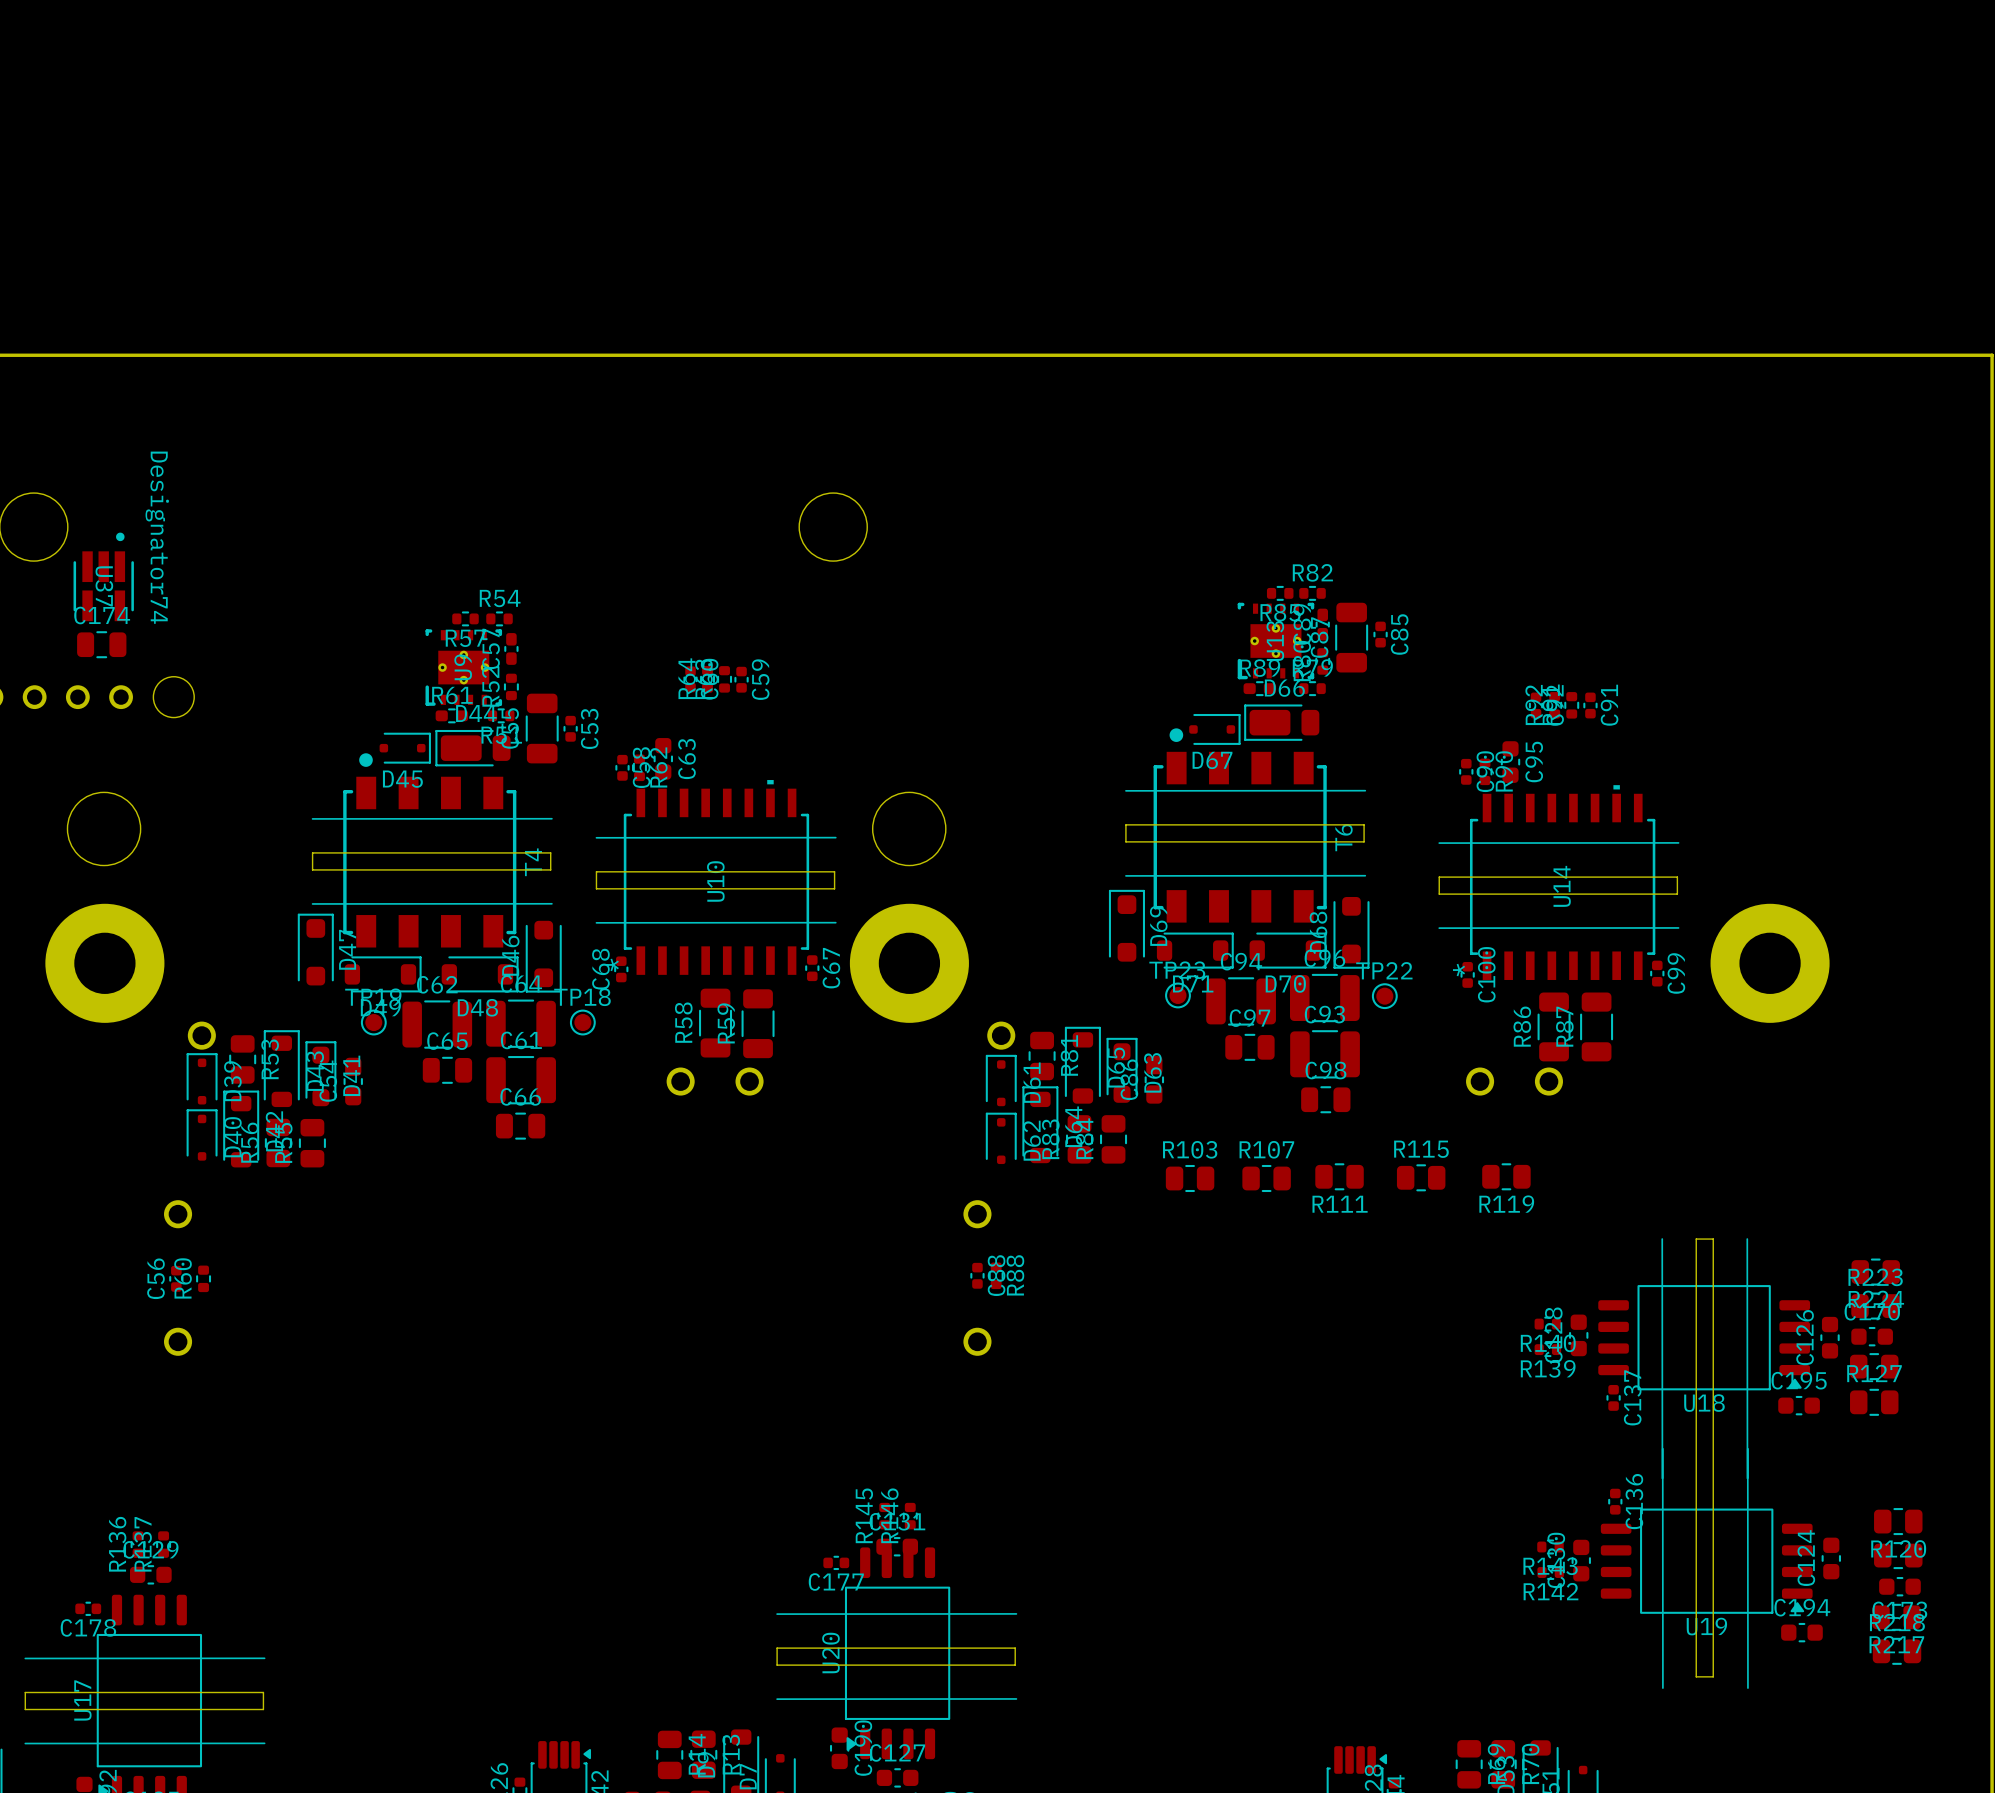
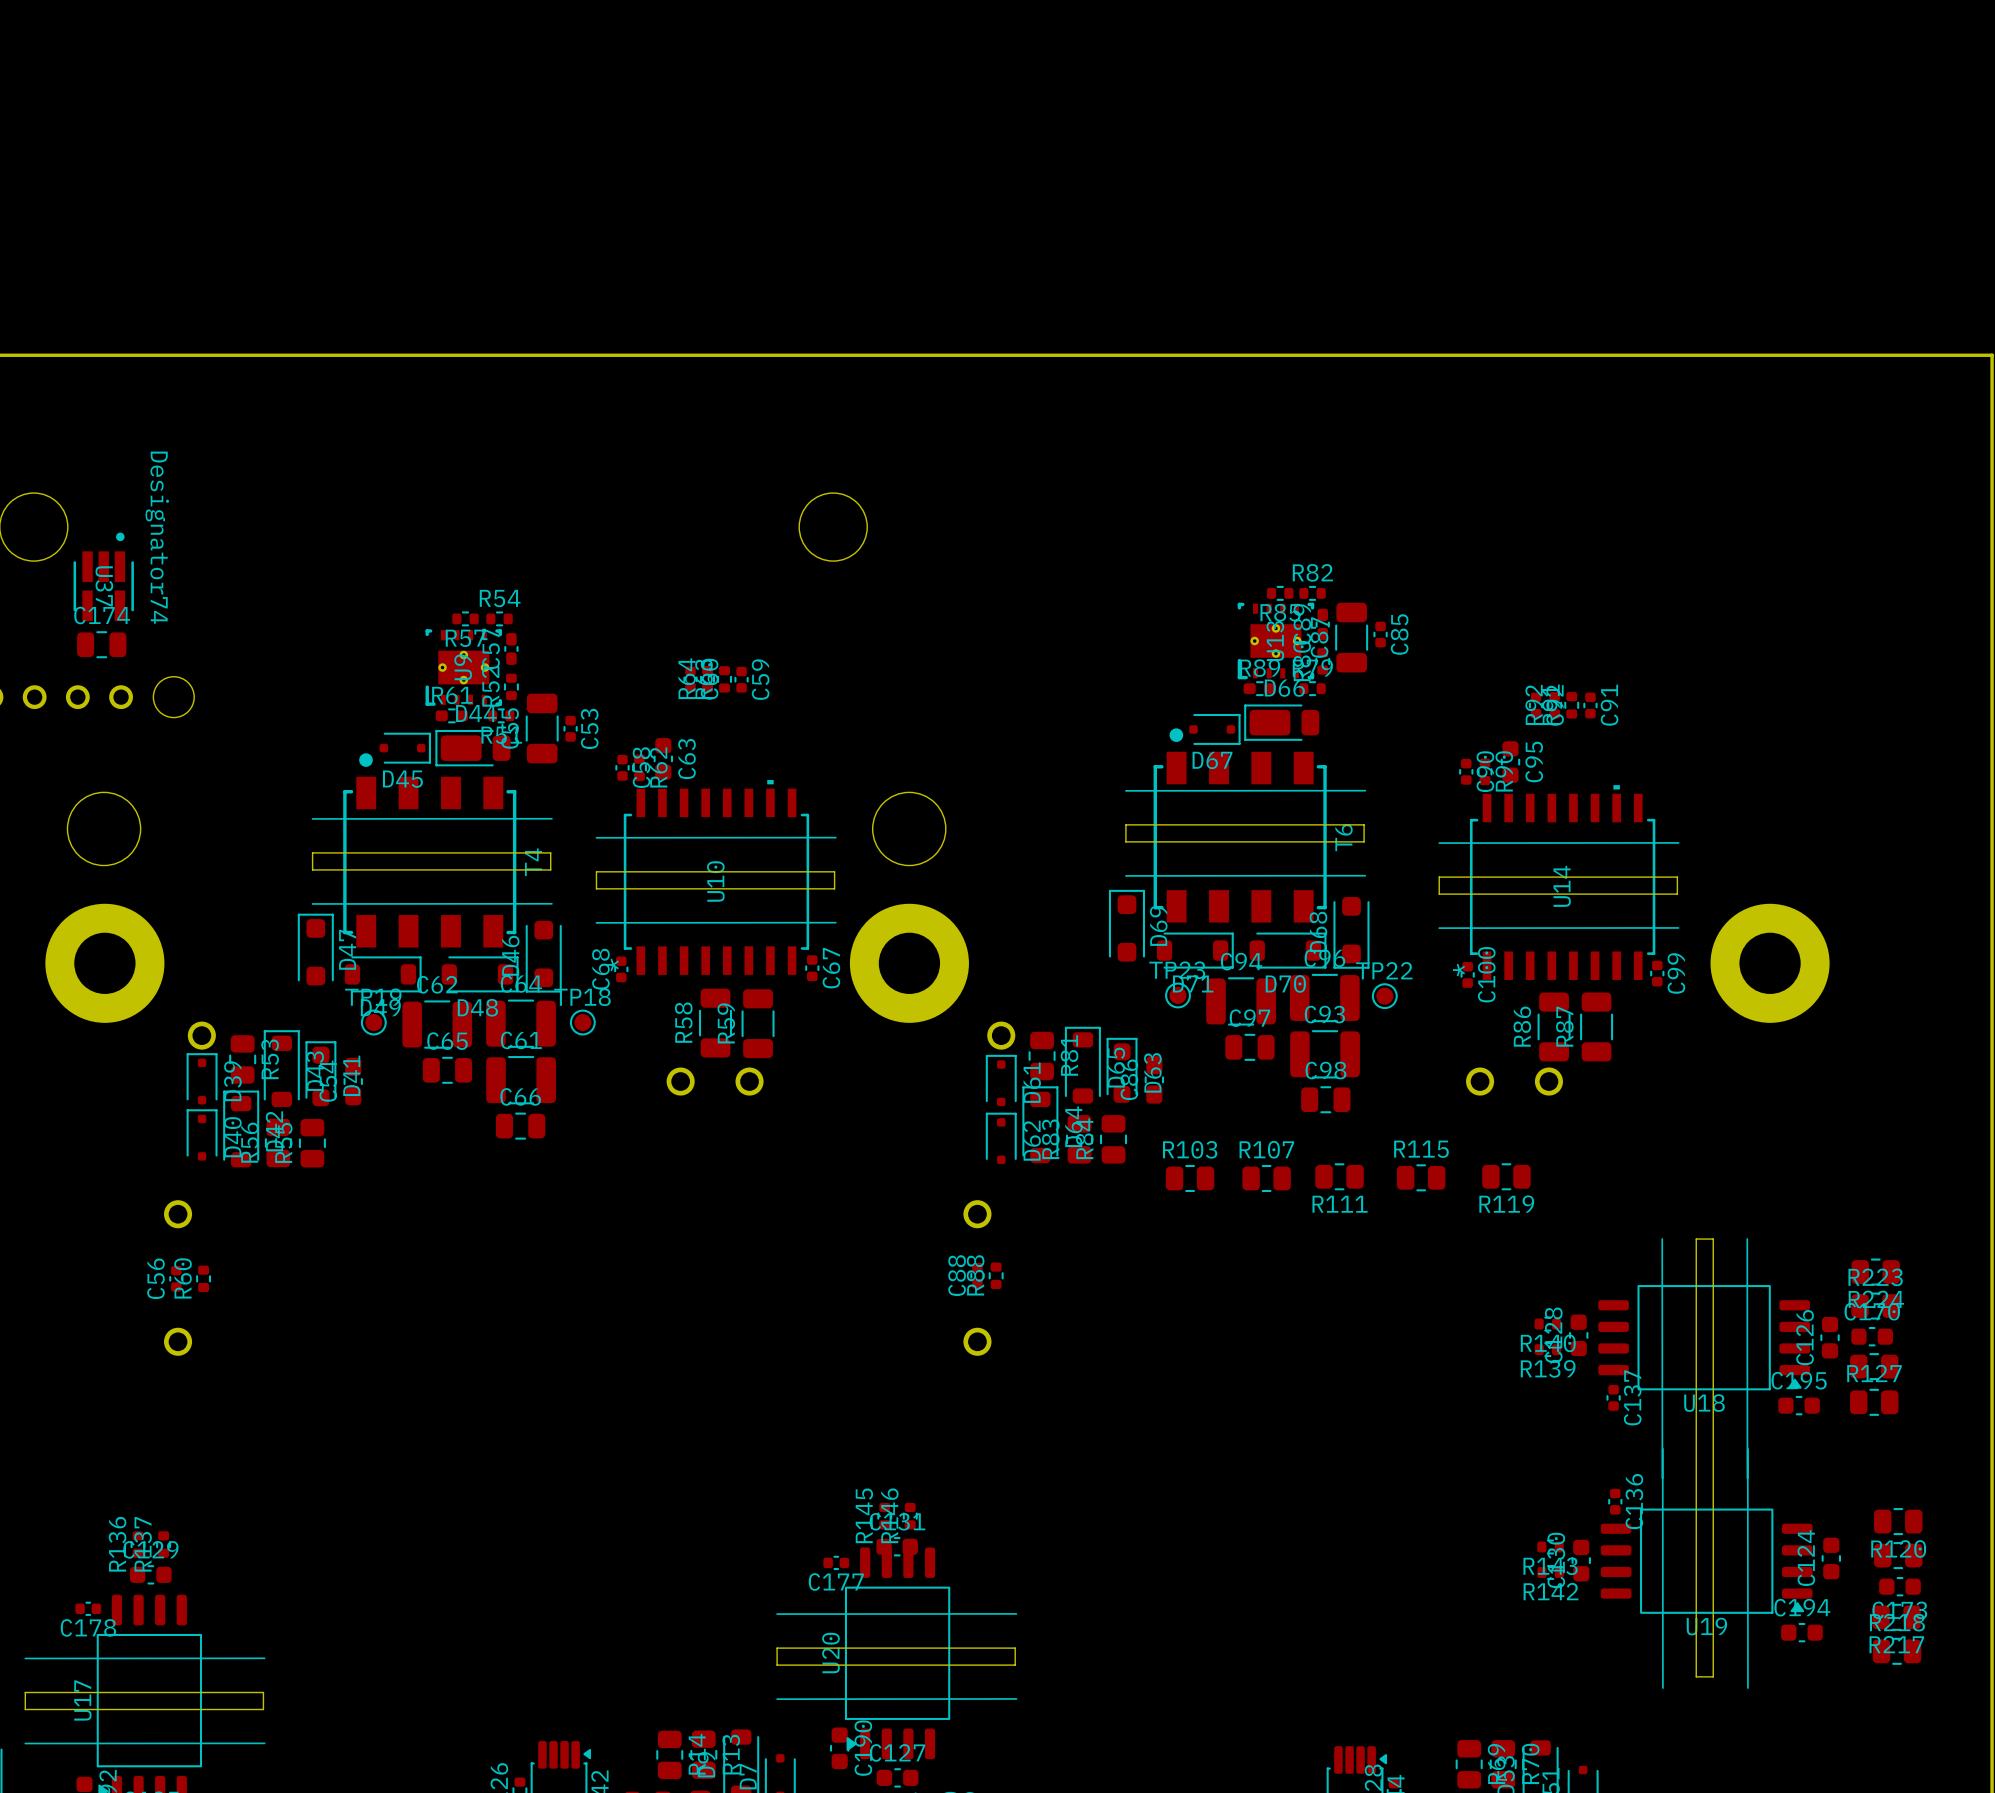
C88 name position: C88 (996, 1275) -> C88 (957, 1275)
R88 name position: R88 (1015, 1275) -> R88 (975, 1275)

